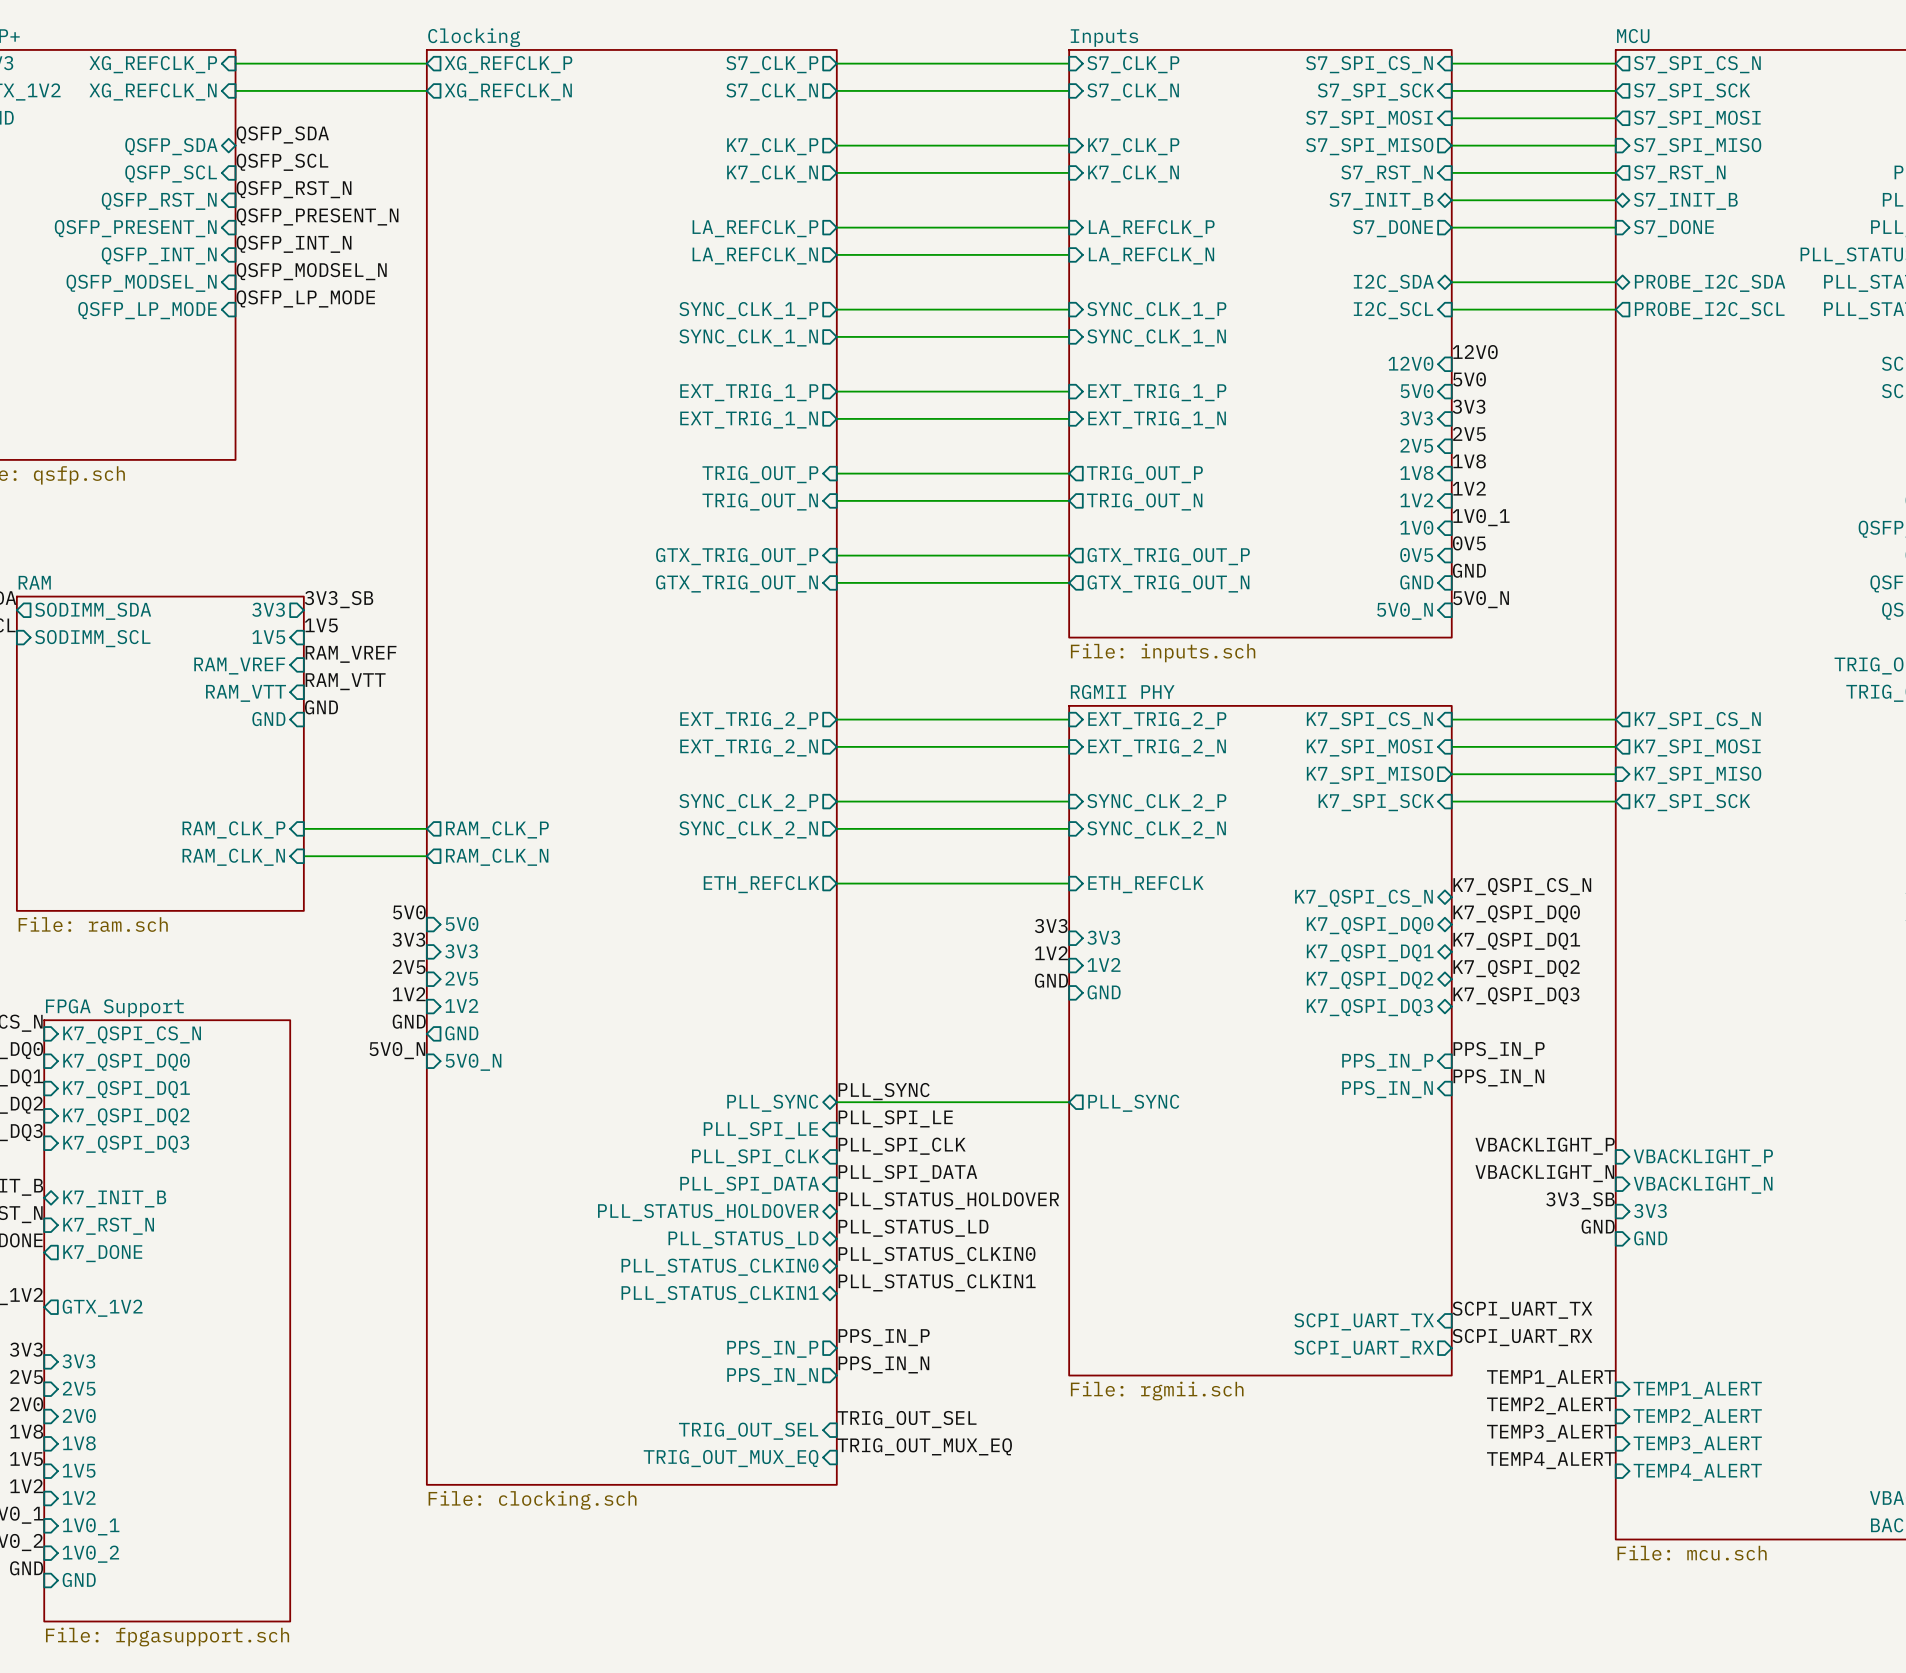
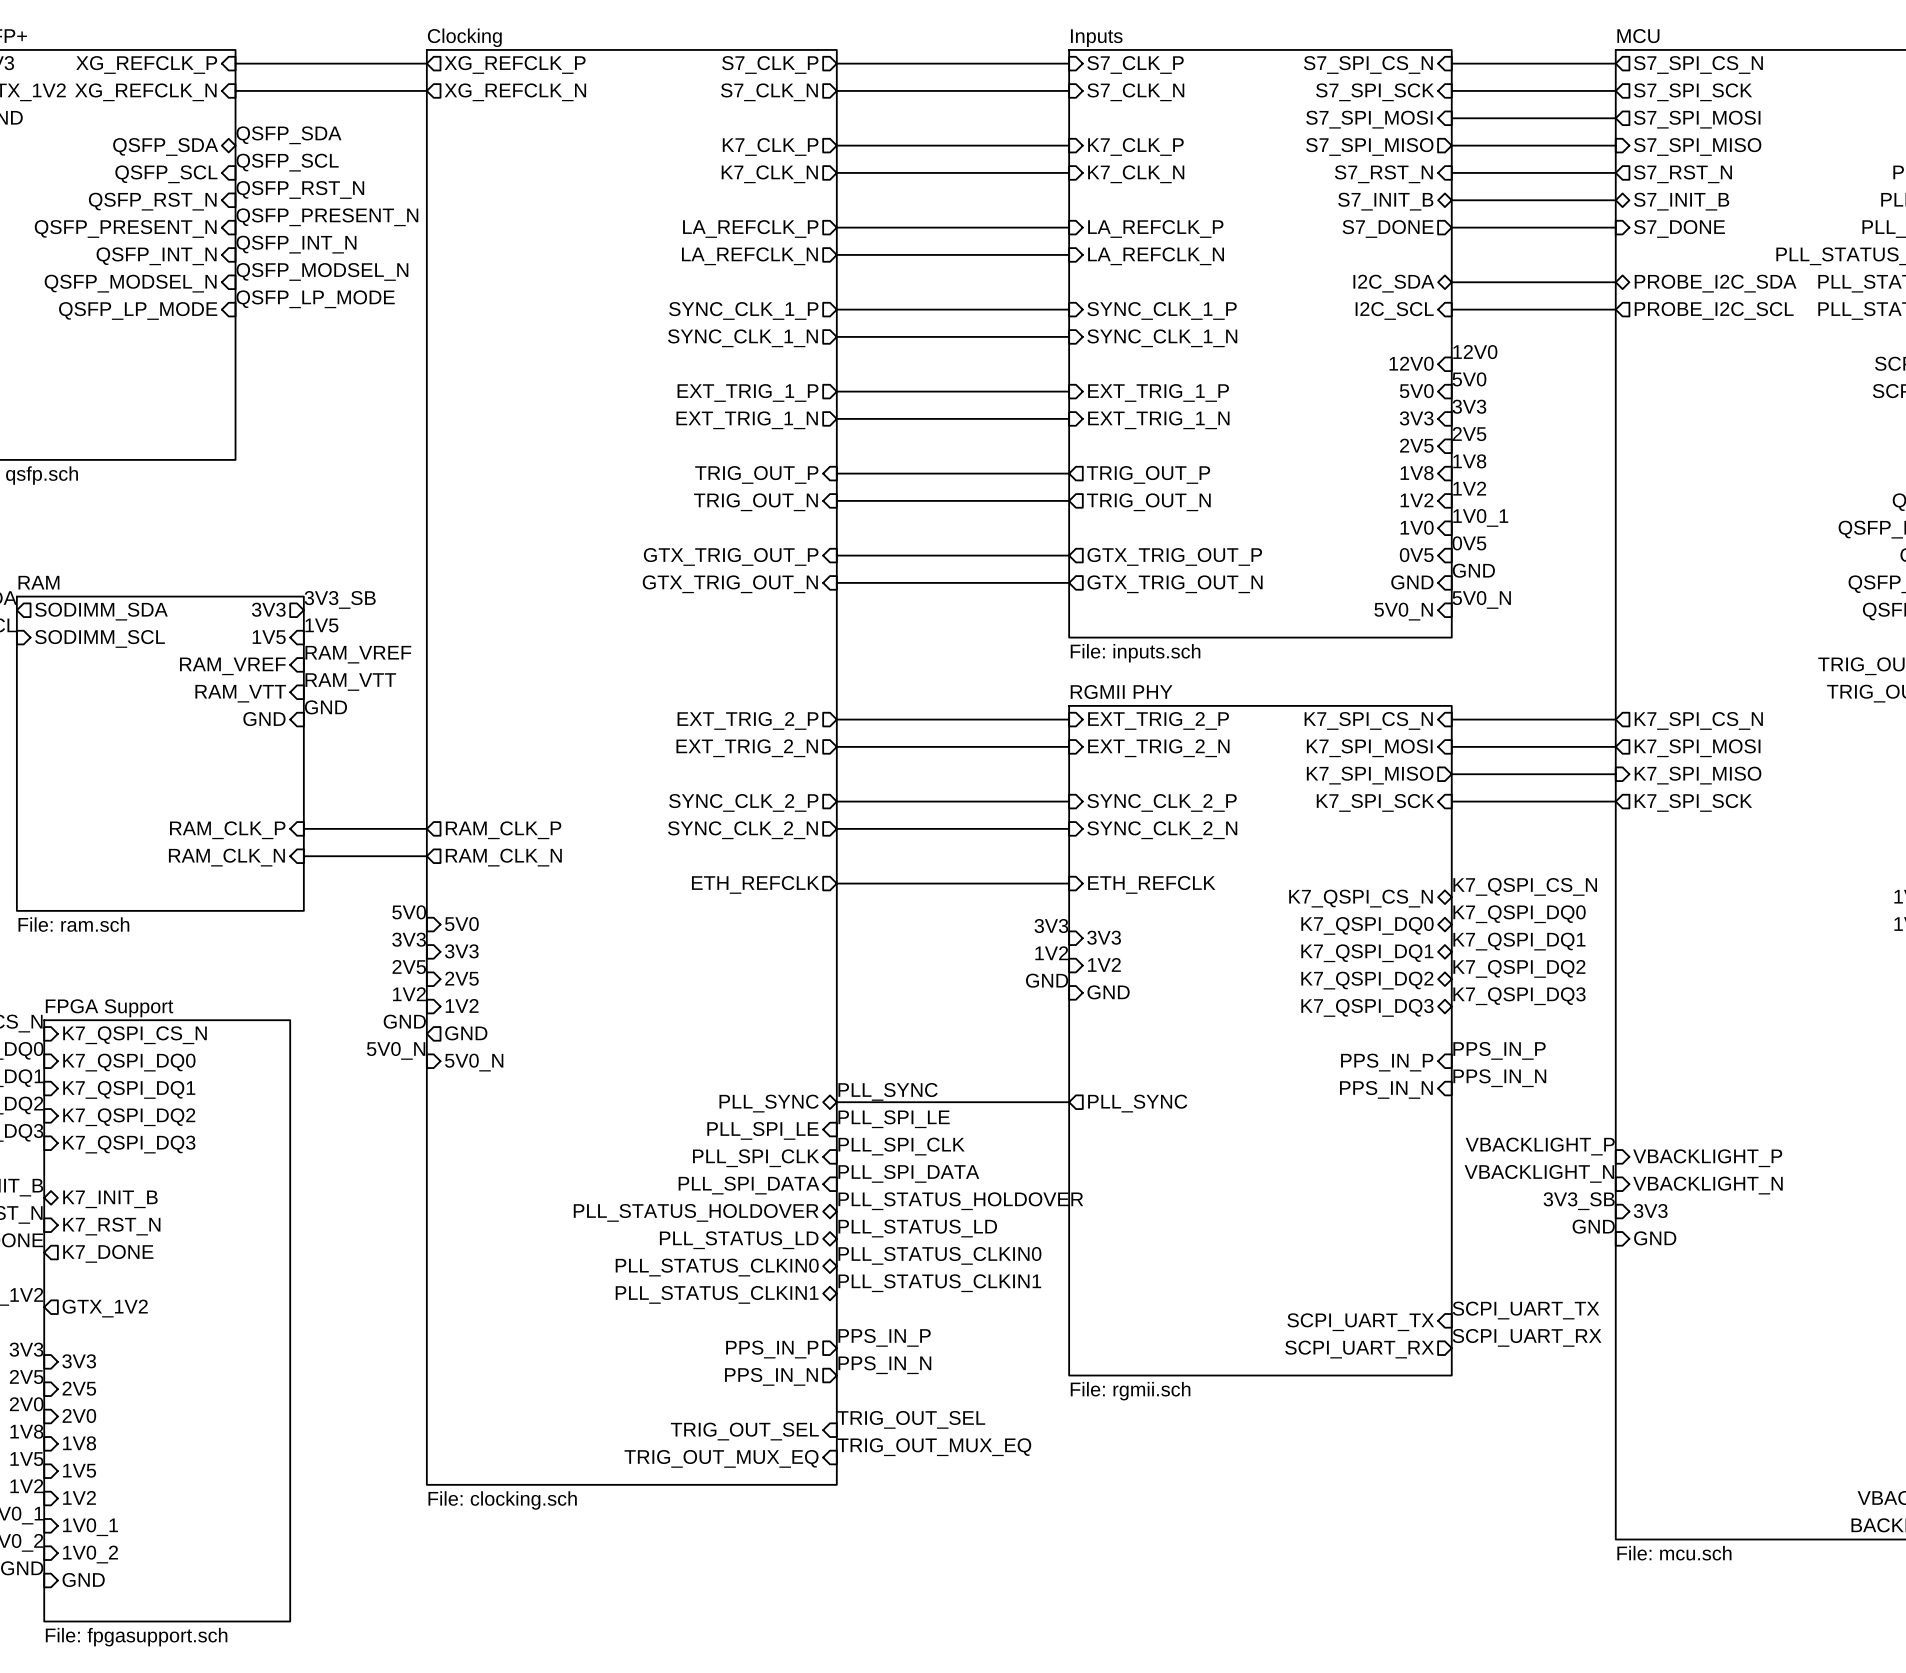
label: TEMP1_ALERT (1551, 1378) -> none
sheet pin: TEMP1_ALERT (1697, 1390) -> none
label: TEMP2_ALERT (1551, 1405) -> none
sheet pin: TEMP2_ALERT (1697, 1417) -> none
label: TEMP3_ALERT (1551, 1433) -> none
sheet pin: TEMP3_ALERT (1697, 1444) -> none
label: TEMP4_ALERT (1551, 1460) -> none
sheet pin: TEMP4_ALERT (1697, 1472) -> none

